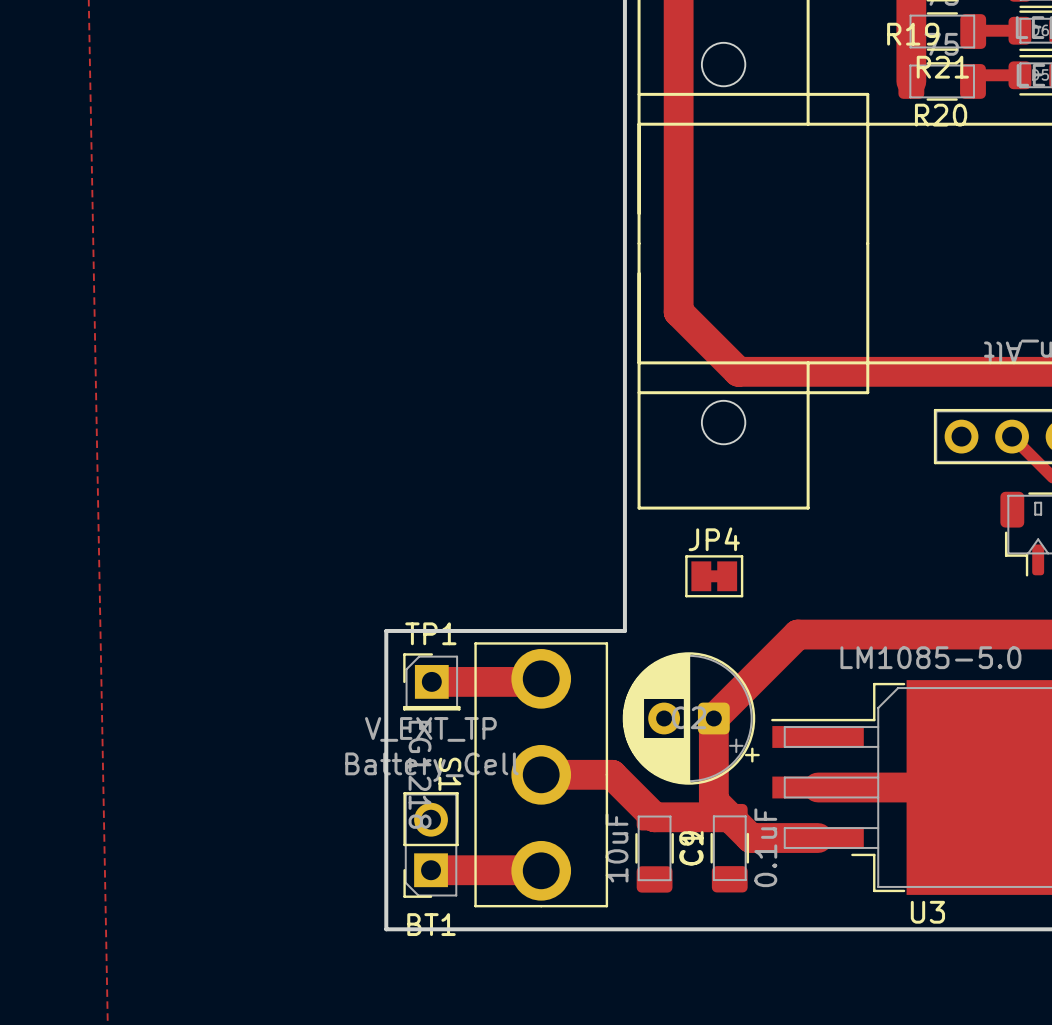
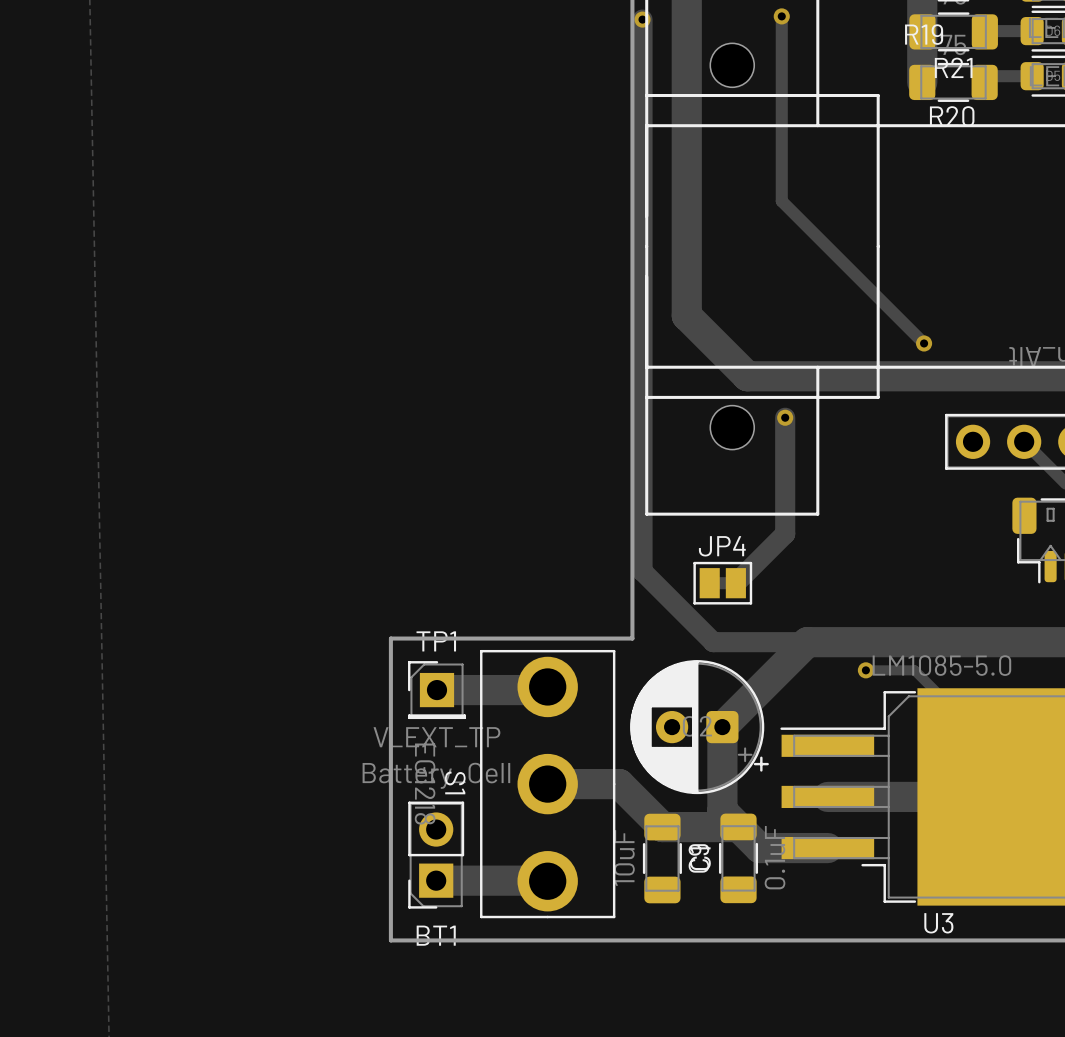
track: none -> (781, 16) (781, 201) (924, 343)
via: none -> (781, 16)
track: none -> (642, 19) (642, 571) (713, 642) (807, 642)
via: none -> (642, 19)
via: none -> (924, 343)
track: none -> (785, 417) (785, 533) (735, 583)
via: none -> (785, 417)
track: none -> (865, 670) (914, 670) (949, 704)
via: none -> (865, 670)

